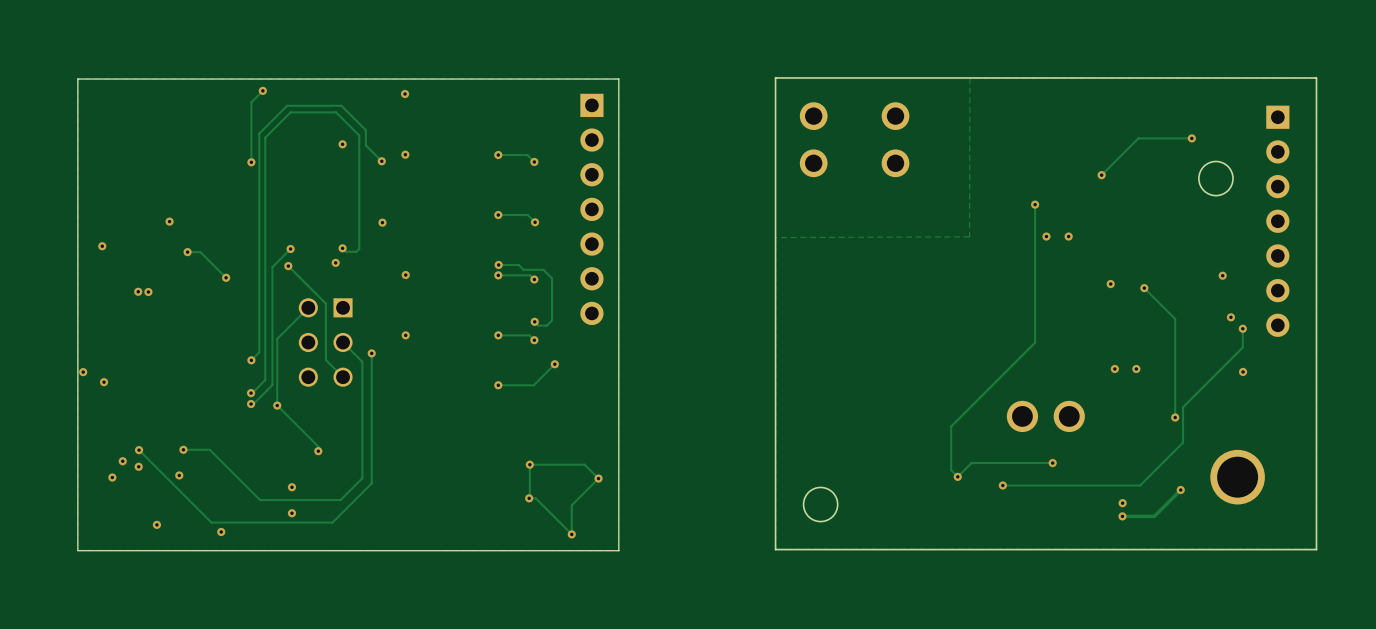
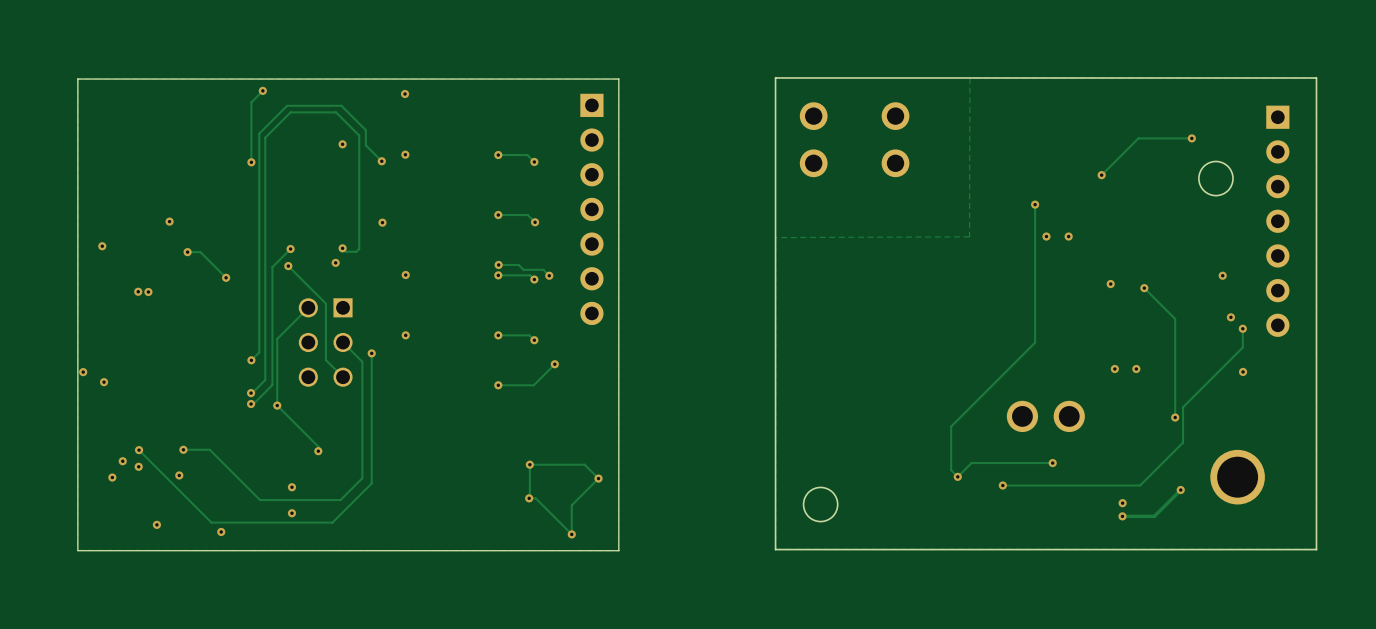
track: (549, 275) (552, 278) (552, 320) (546, 325) (538, 325) (534, 321) -> none
via position: (534, 321) -> (549, 275)

